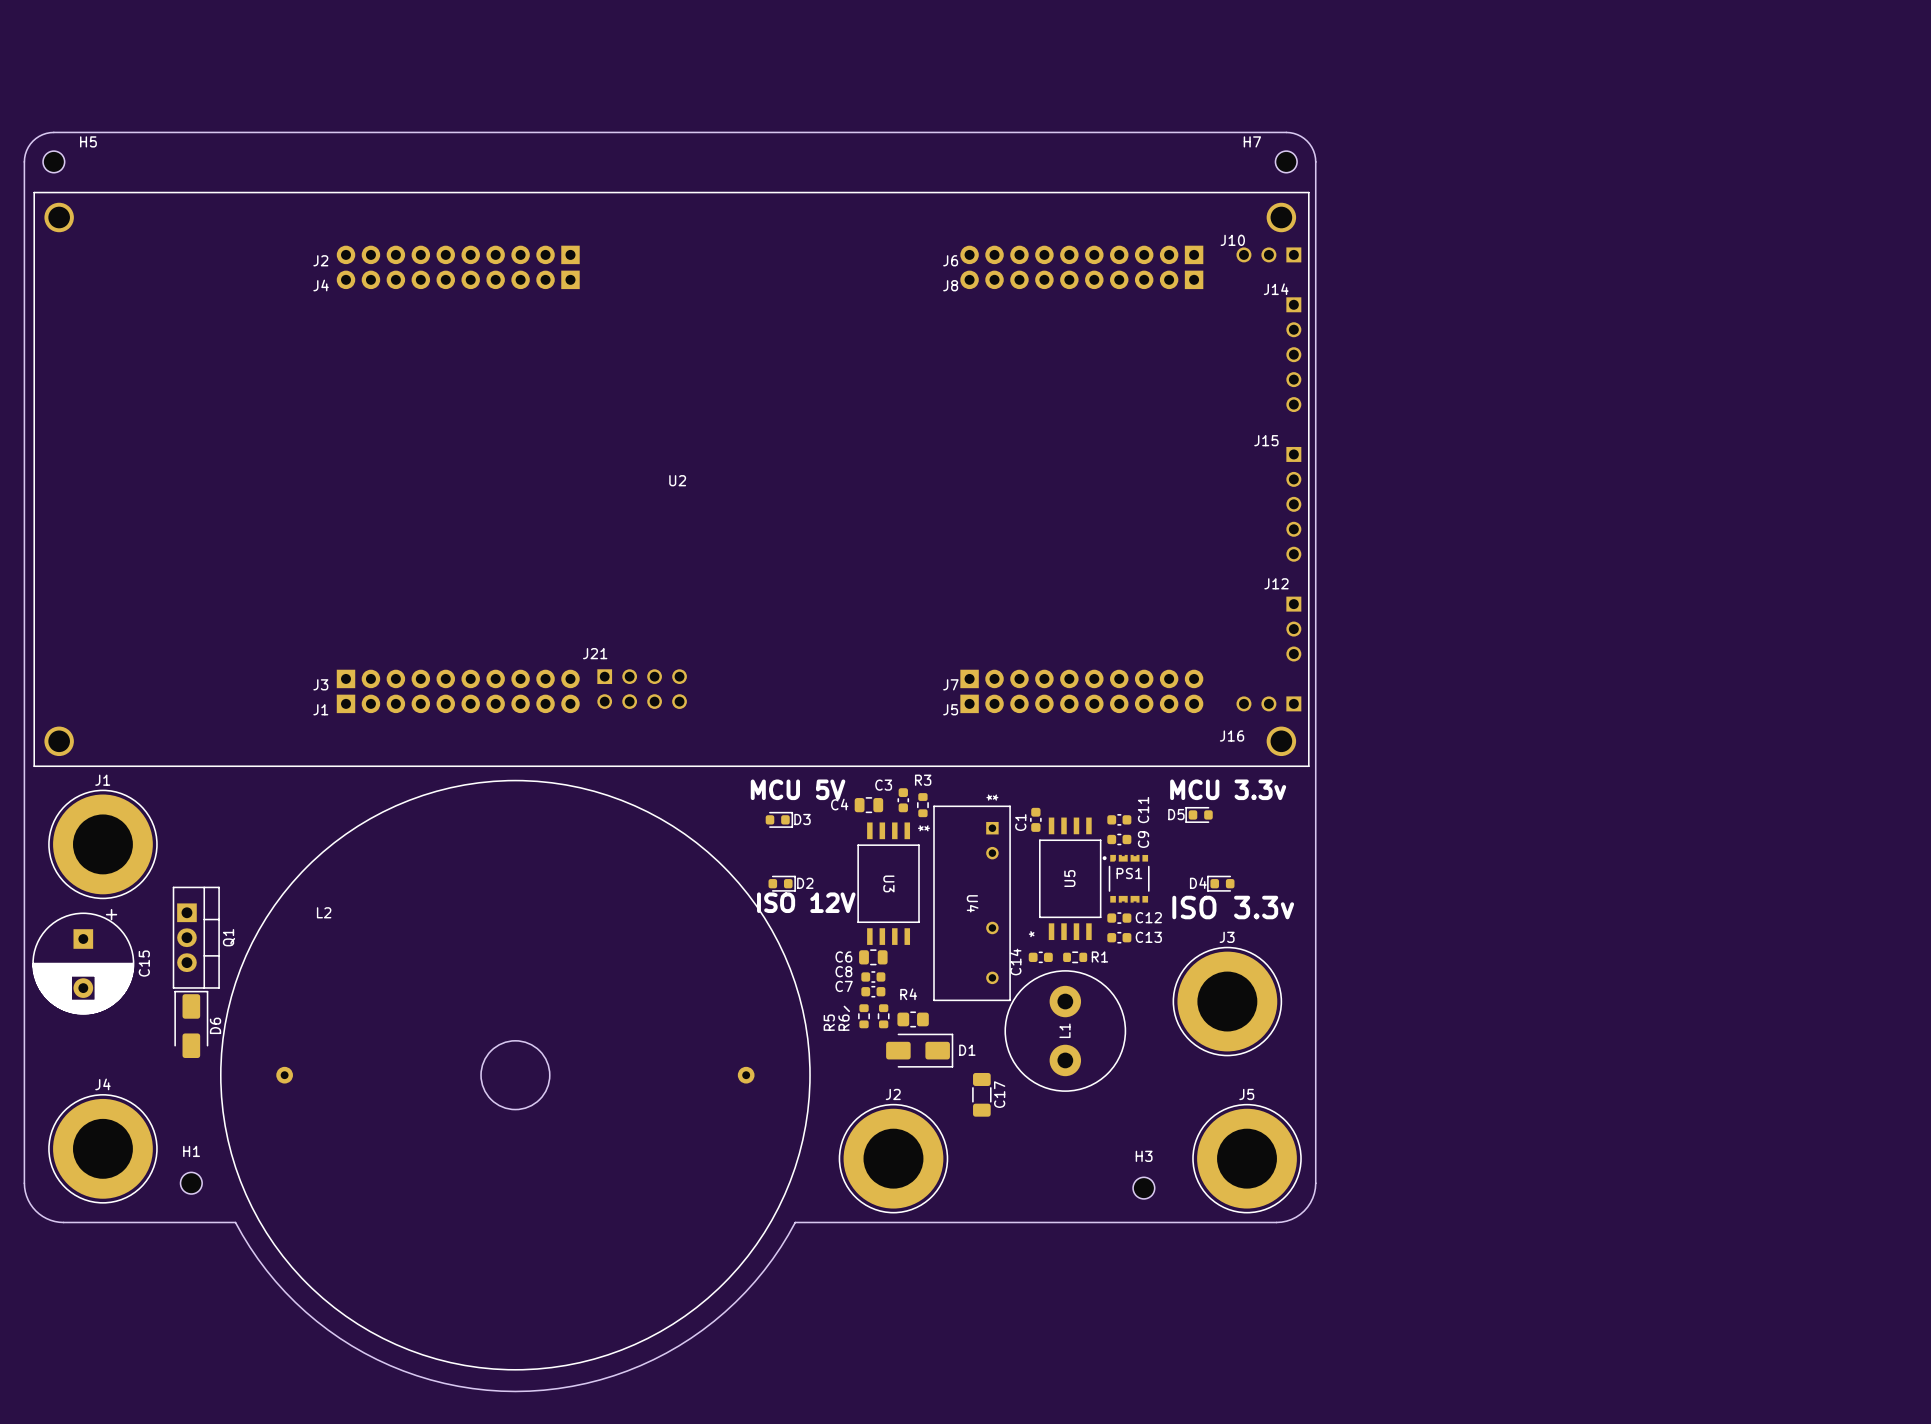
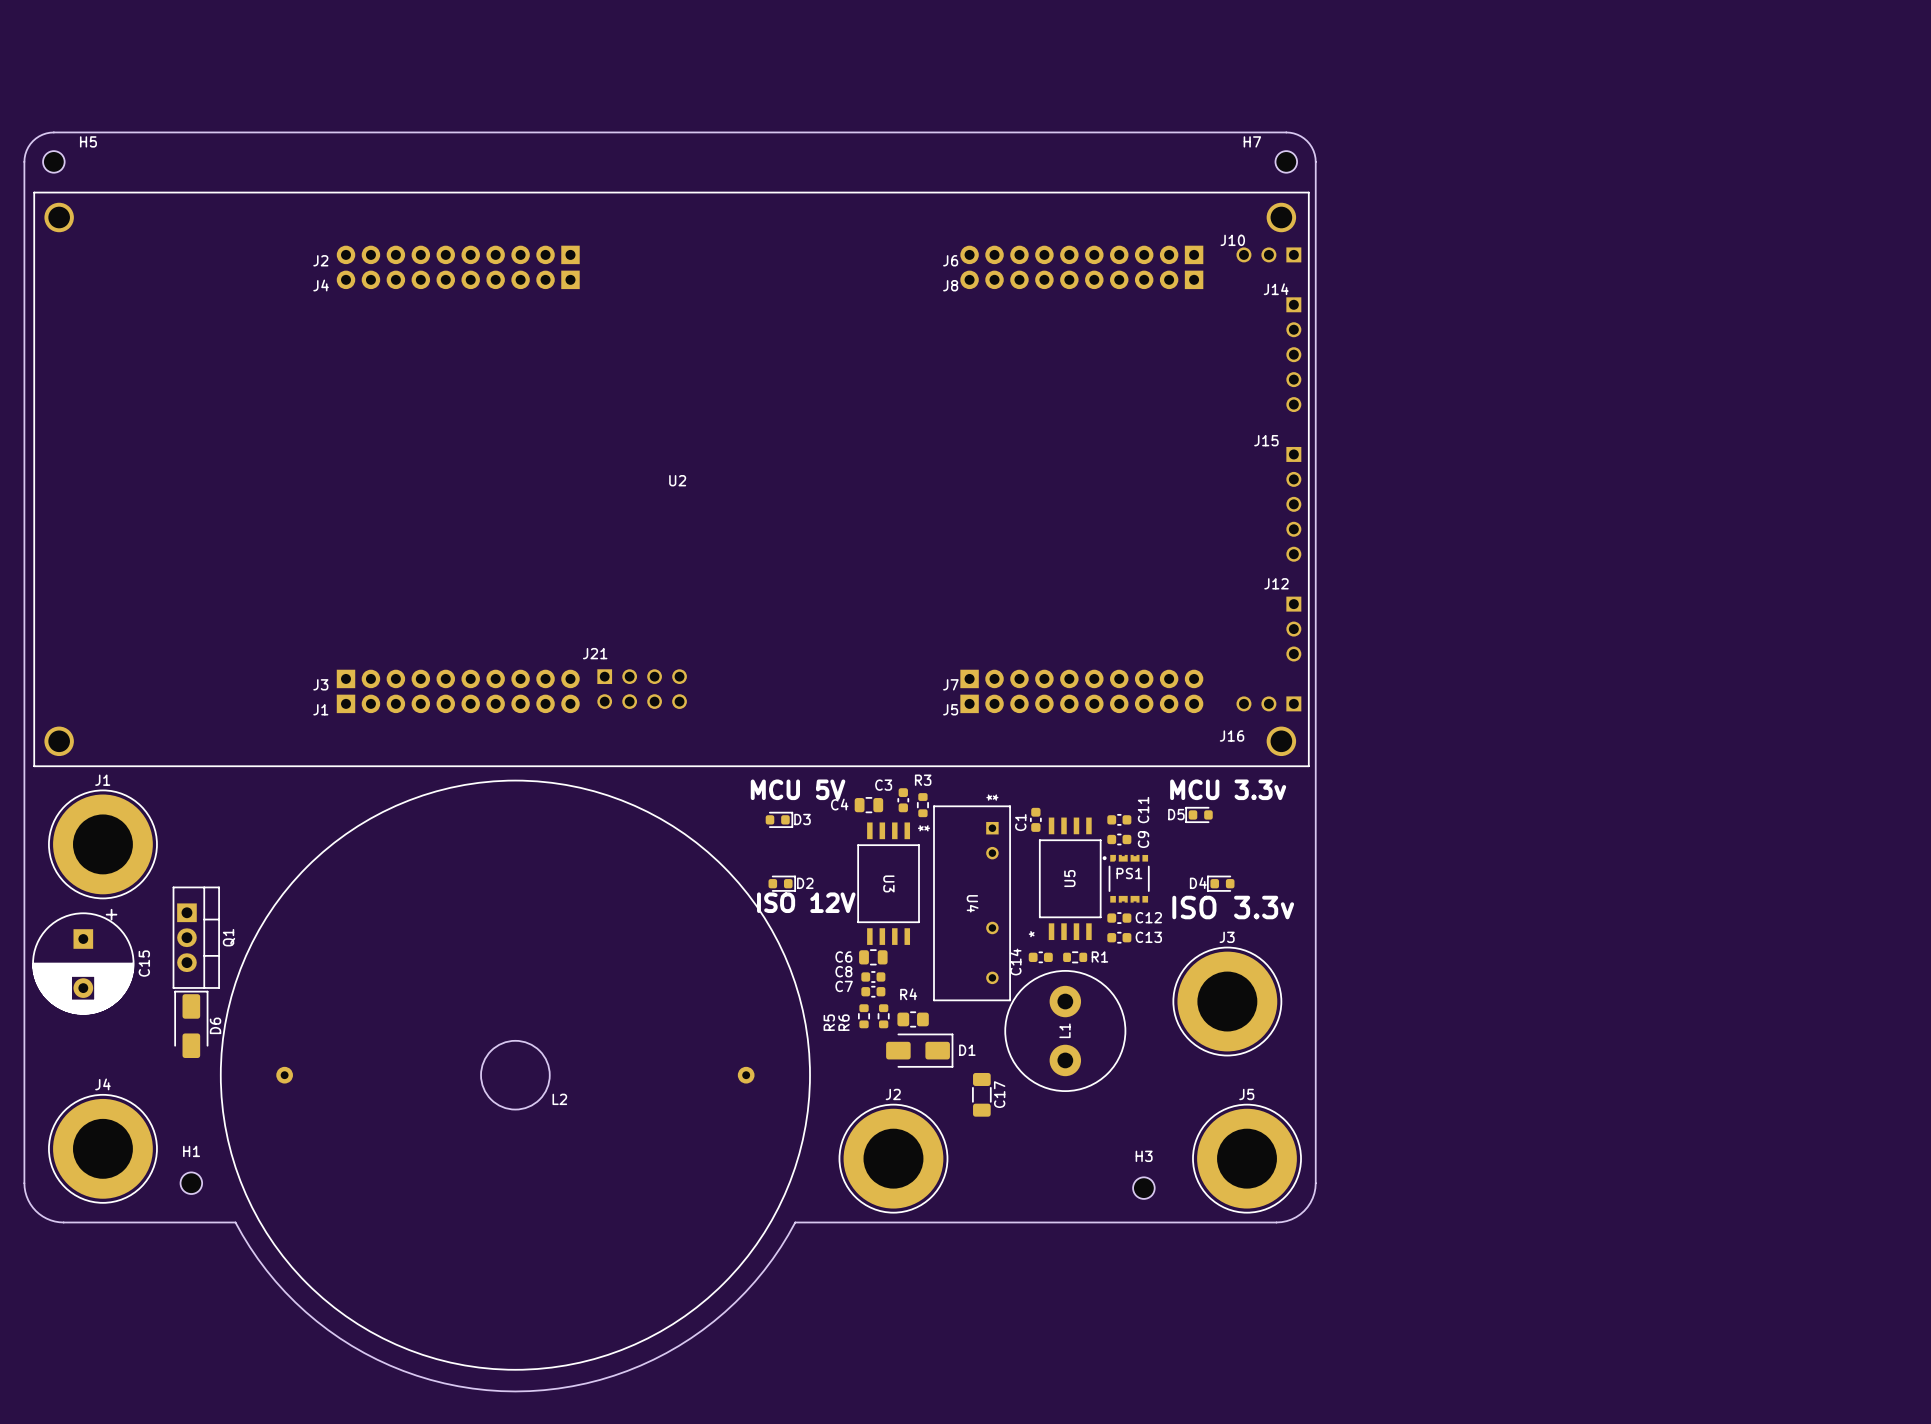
L2 name position: L2 (324, 912) -> L2 (559, 1099)
line: (844, 1006) (849, 1011) -> none

